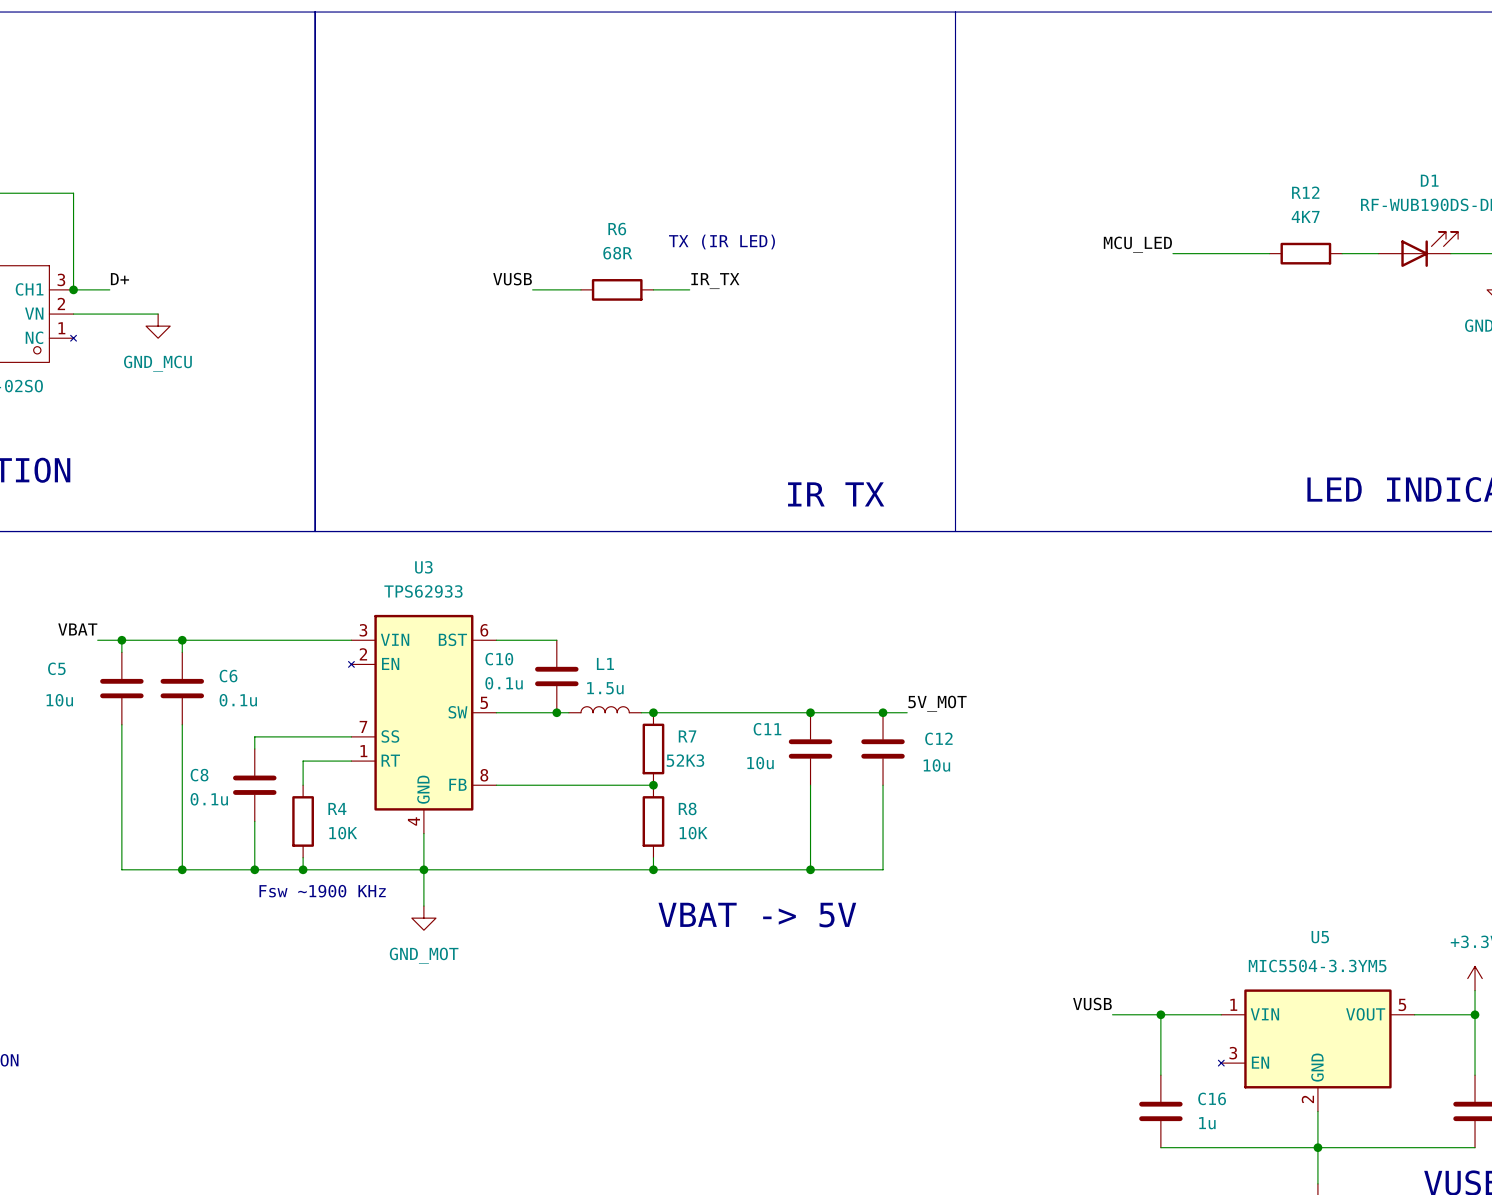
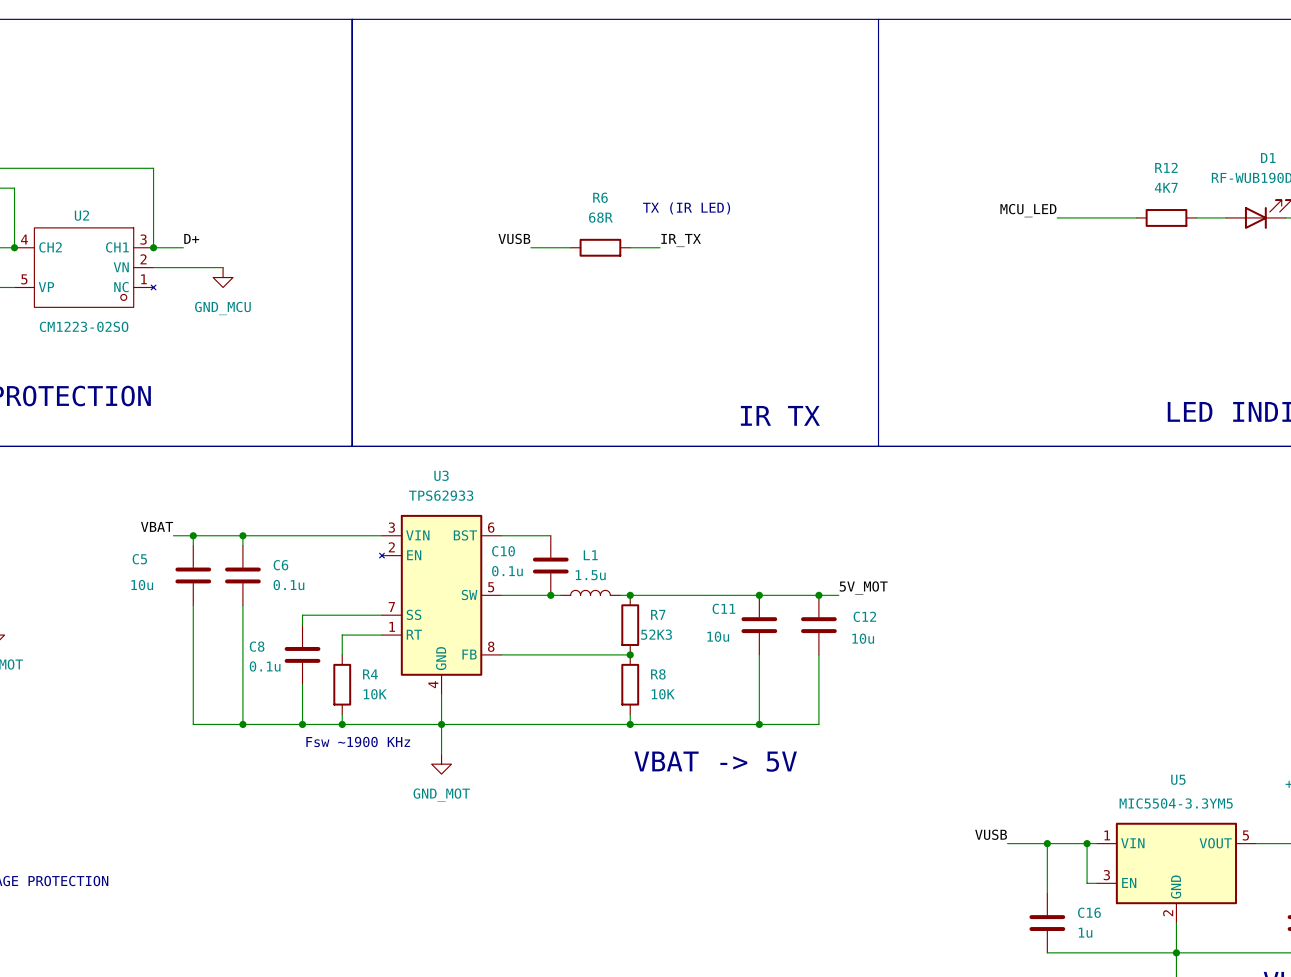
U5 symbol: [1218, 989, 1415, 1112] -> [1096, 822, 1256, 924]
wire: none -> (1087, 843) (1087, 883) (1096, 883)
junction: none -> (1087, 843)

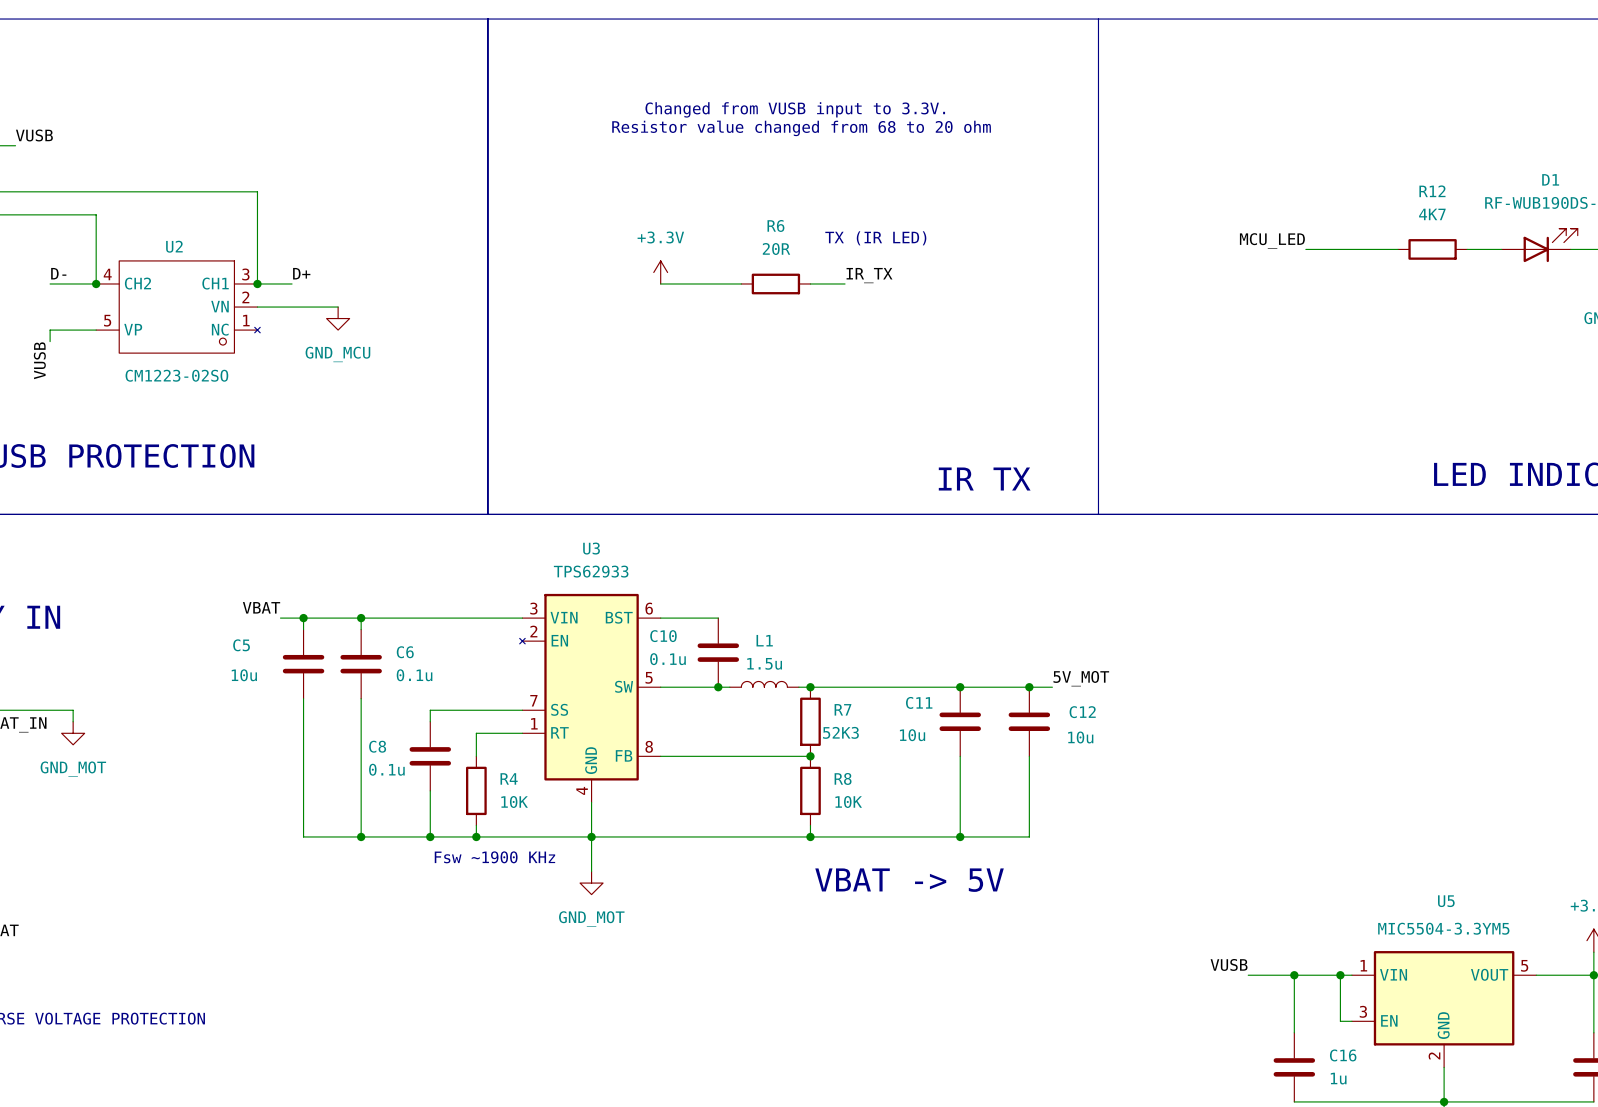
text: none -> Changed from VUSB input to 3.3V. (795, 109)
text: none -> Resistor value changed from 68 to 20 ohm (801, 128)
R6 value: 68R (600, 217) -> 20R (776, 249)
power symbol: none -> +3.3V (660, 272)
label: VUSB (514, 238) -> none
wire: none -> (660, 283) (695, 283)

